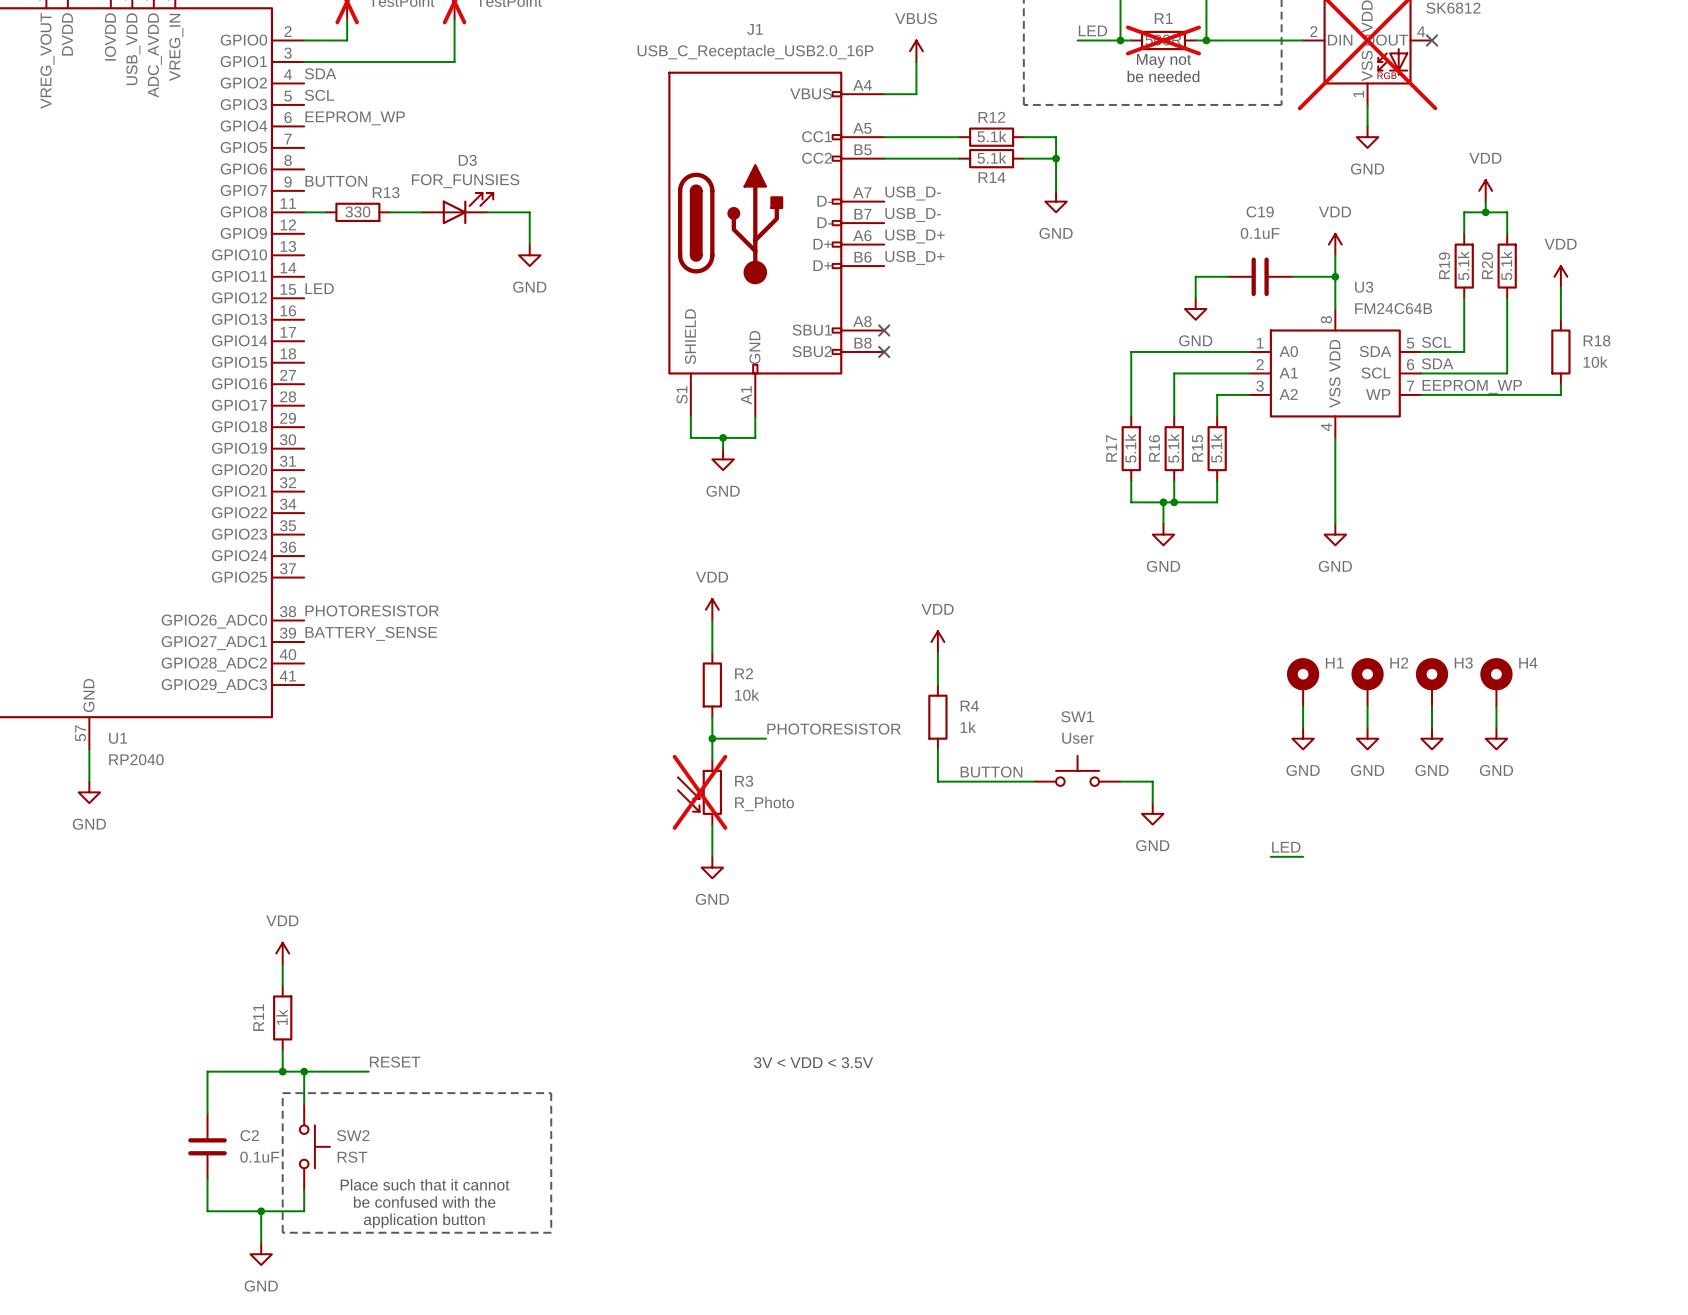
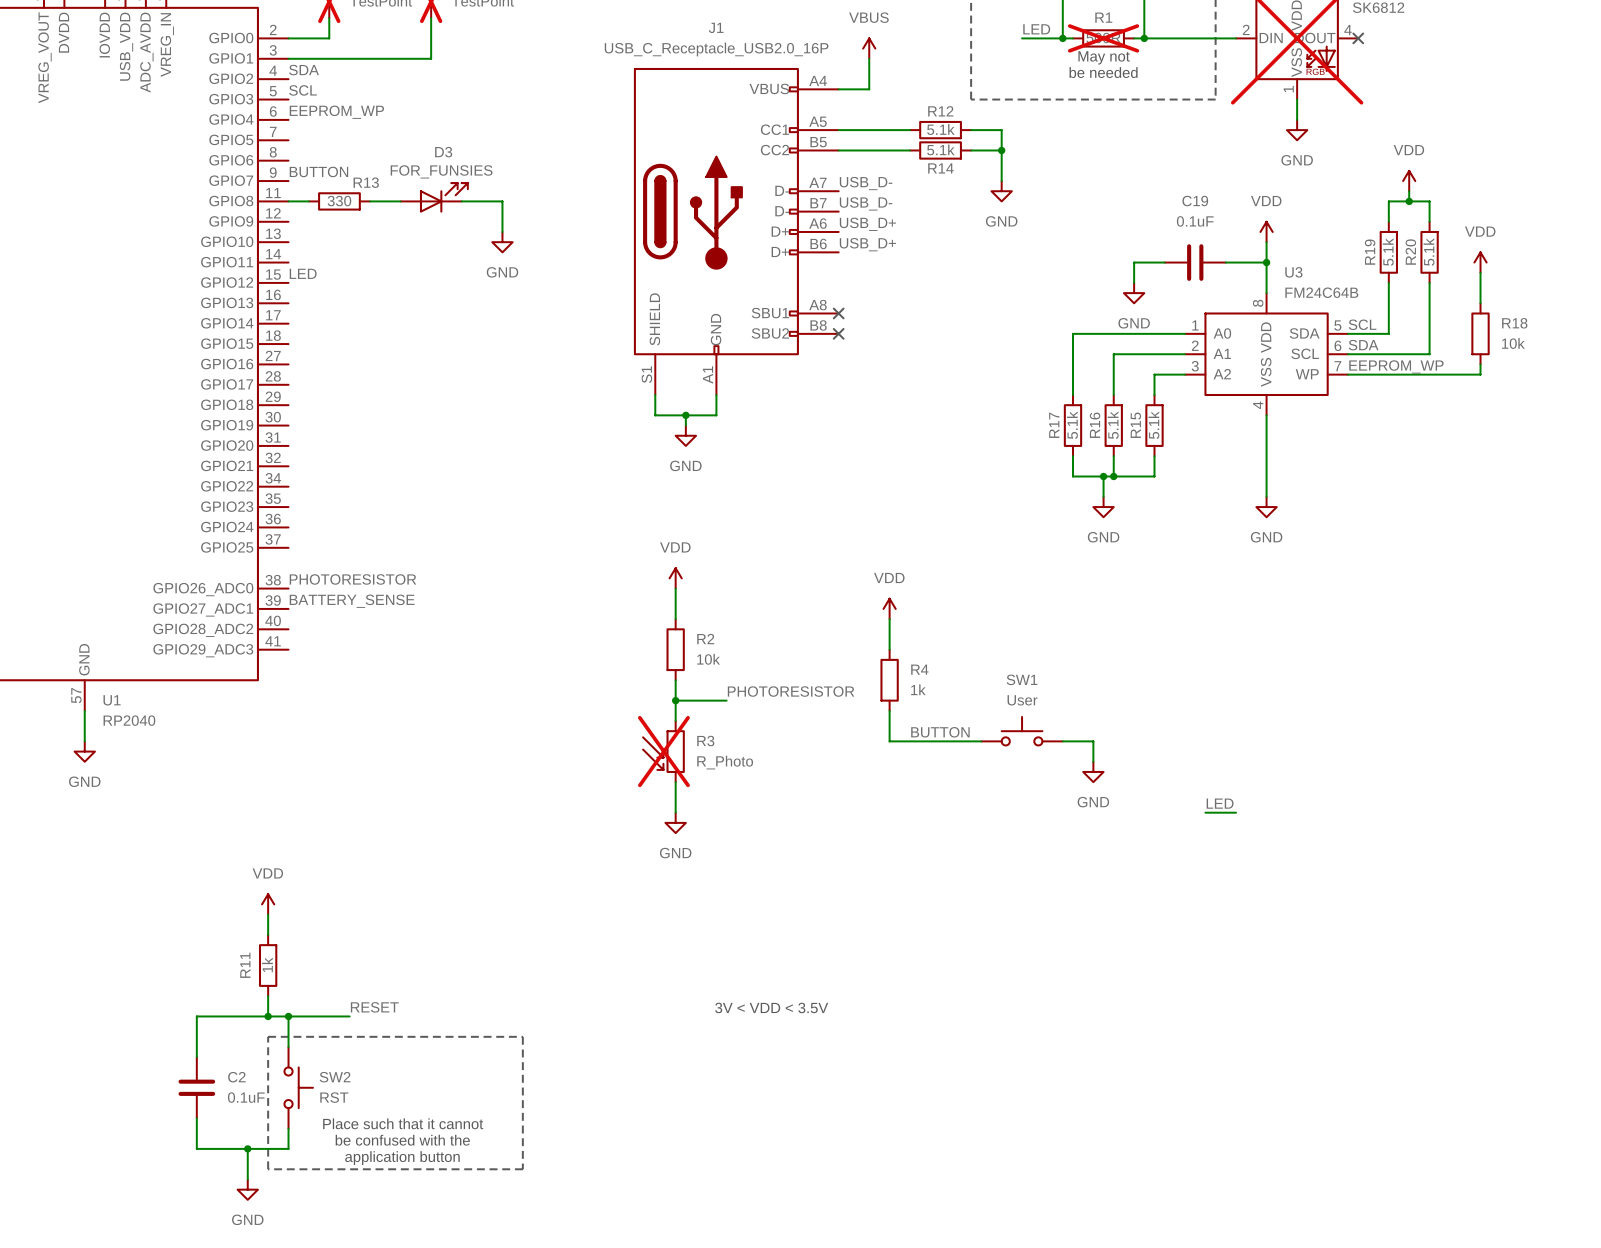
H1: (1303, 682) -> none
H2: (1367, 682) -> none
H3: (1432, 682) -> none
H4: (1496, 682) -> none
wire: (1303, 706) (1303, 727) -> none
wire: (1367, 706) (1367, 727) -> none
wire: (1432, 706) (1432, 727) -> none
wire: (1496, 706) (1496, 727) -> none
power symbol: GND (1303, 738) -> none
power symbol: GND (1367, 738) -> none
power symbol: GND (1432, 738) -> none
power symbol: GND (1496, 738) -> none

